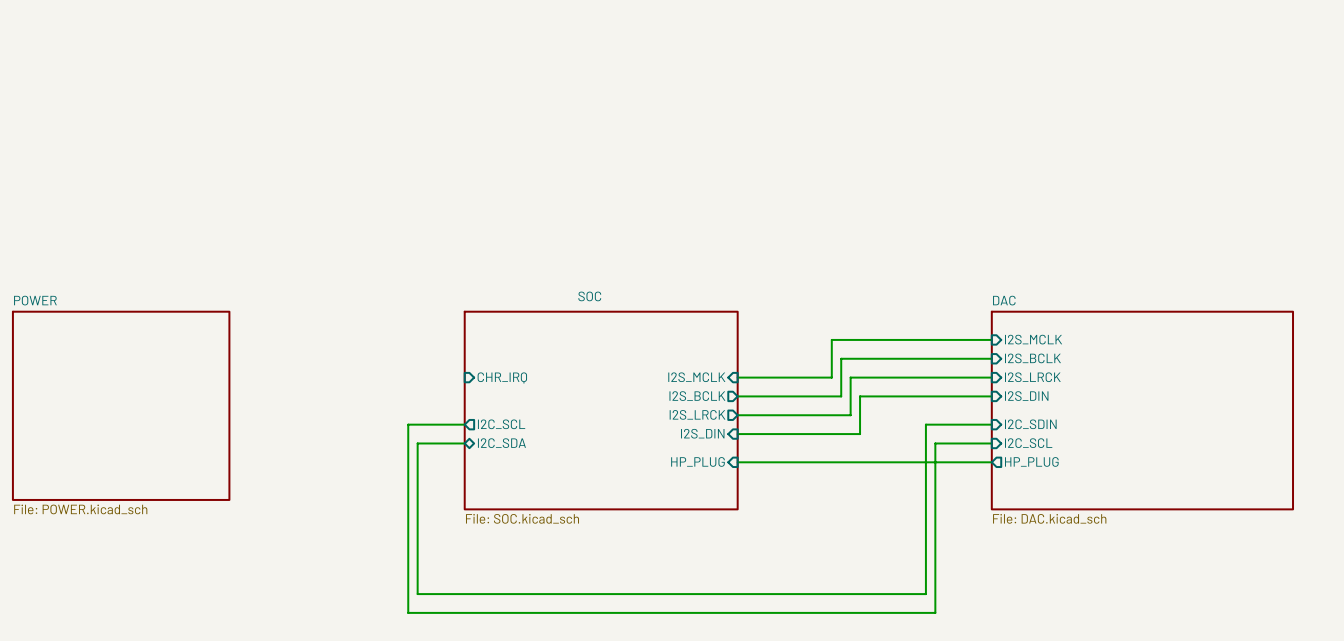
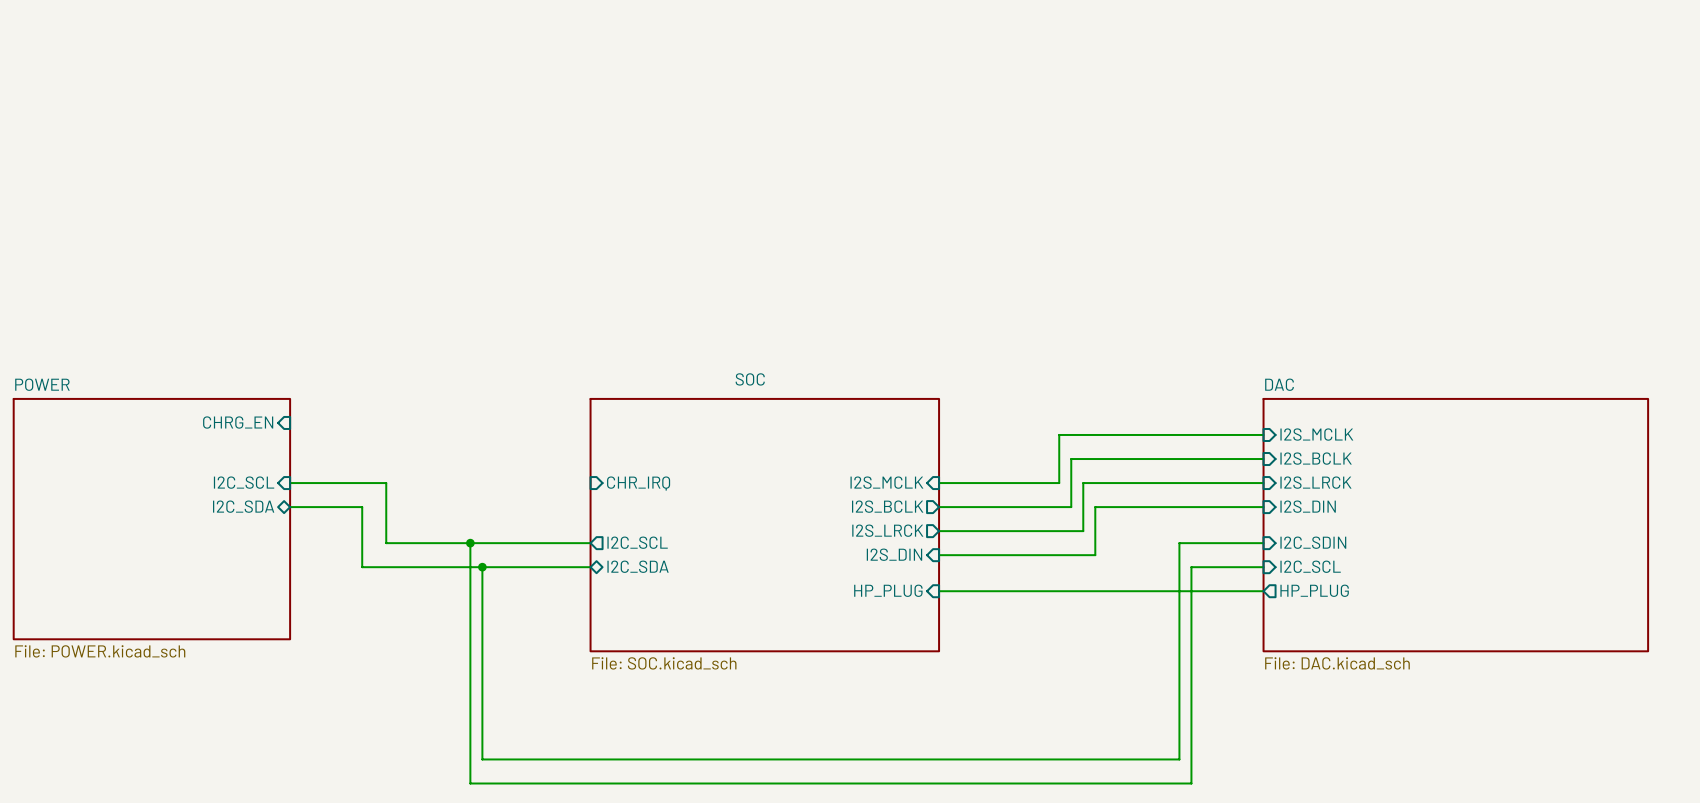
sheet pin: none -> CHRG_EN (238, 422)
sheet pin: none -> I2C_SCL (244, 482)
wire: none -> (290, 483) (386, 483) (386, 543) (518, 543)
sheet pin: none -> I2C_SDA (243, 506)
wire: none -> (290, 507) (362, 507) (362, 567) (530, 567)
junction: none -> (470, 543)
wire: (408, 424) (408, 612) -> (470, 543) (470, 783) (518, 783)
junction: none -> (482, 567)
wire: (417, 443) (417, 594) -> (482, 567) (482, 759) (530, 759)

